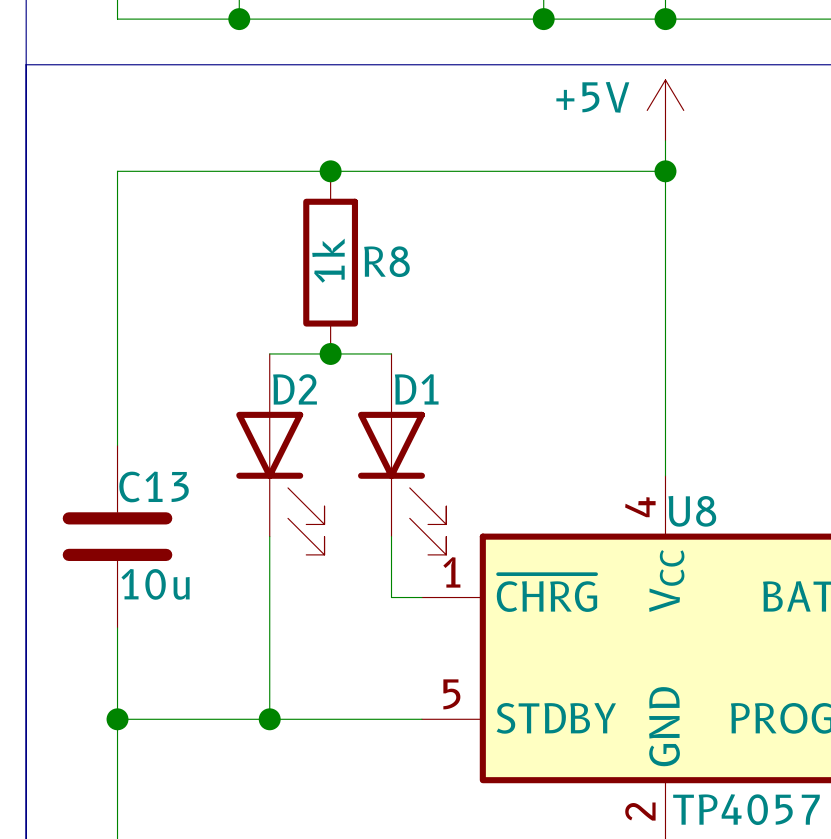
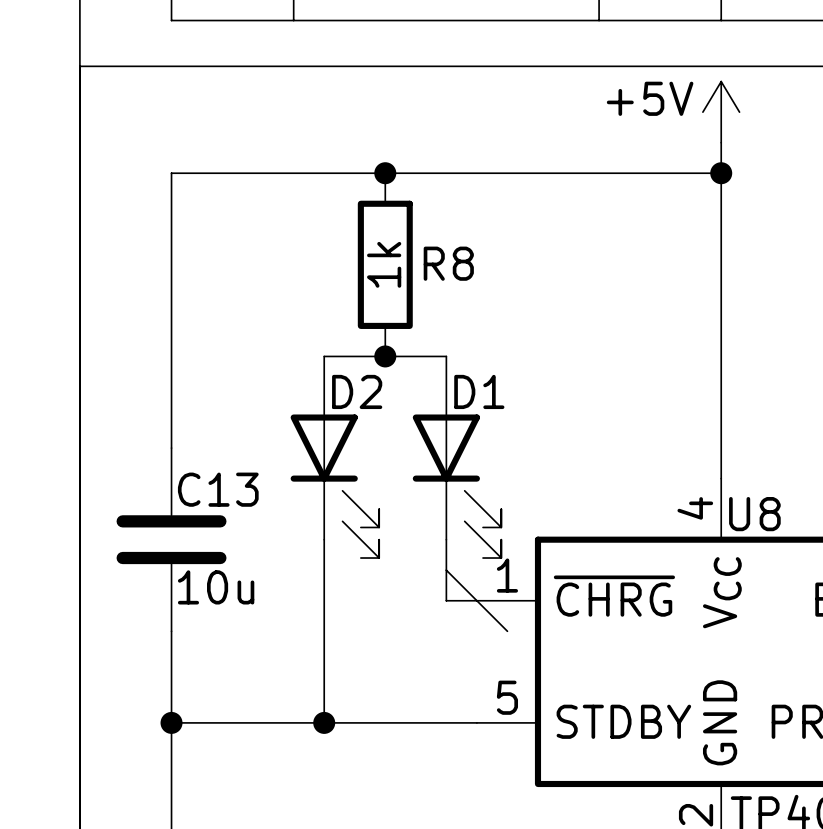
junction: (239, 19) -> none
junction: (543, 19) -> none
junction: (665, 19) -> none
wire: none -> (446, 570) (507, 631)

